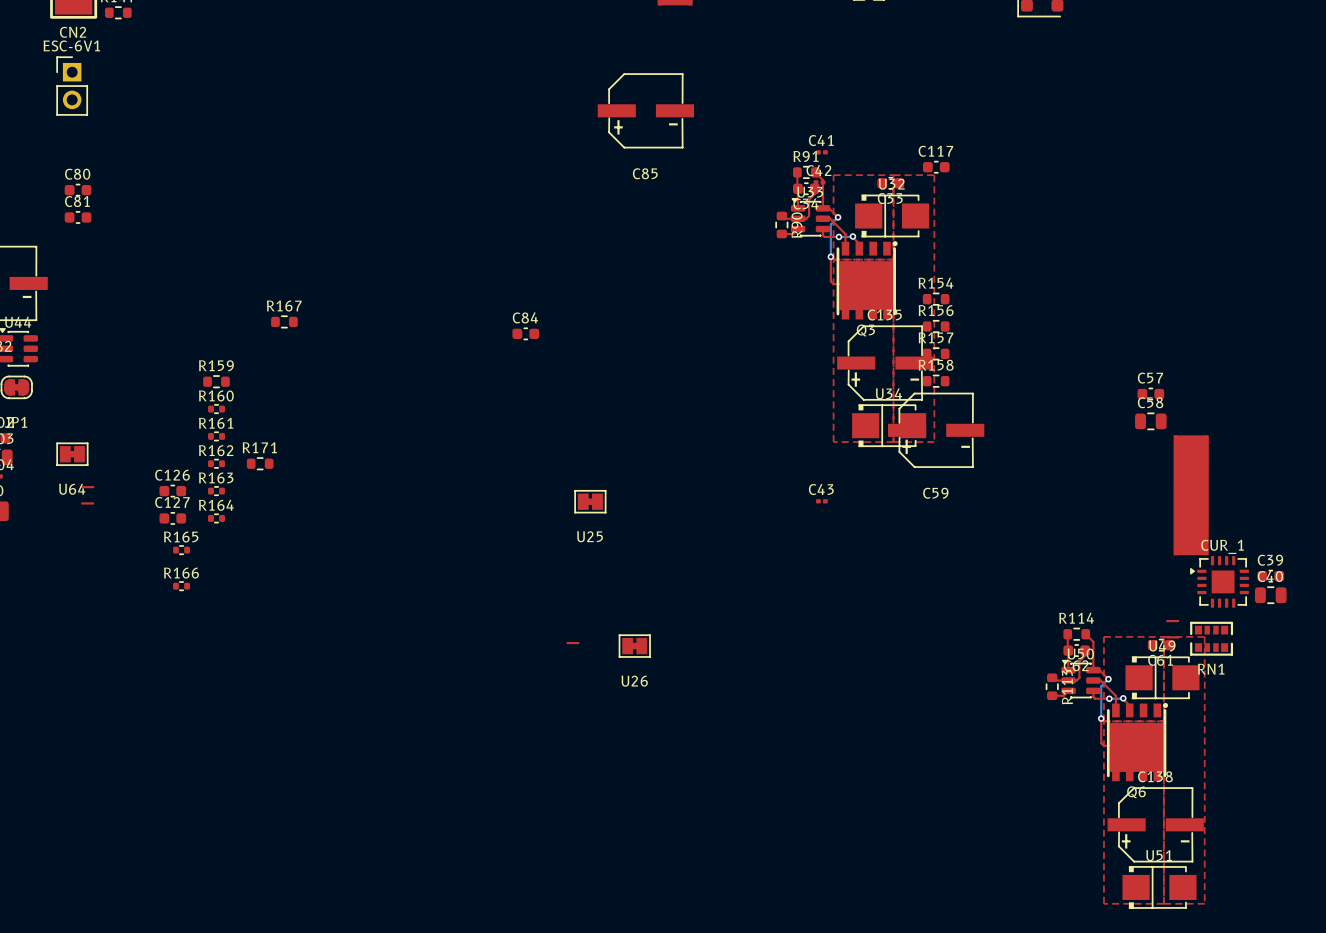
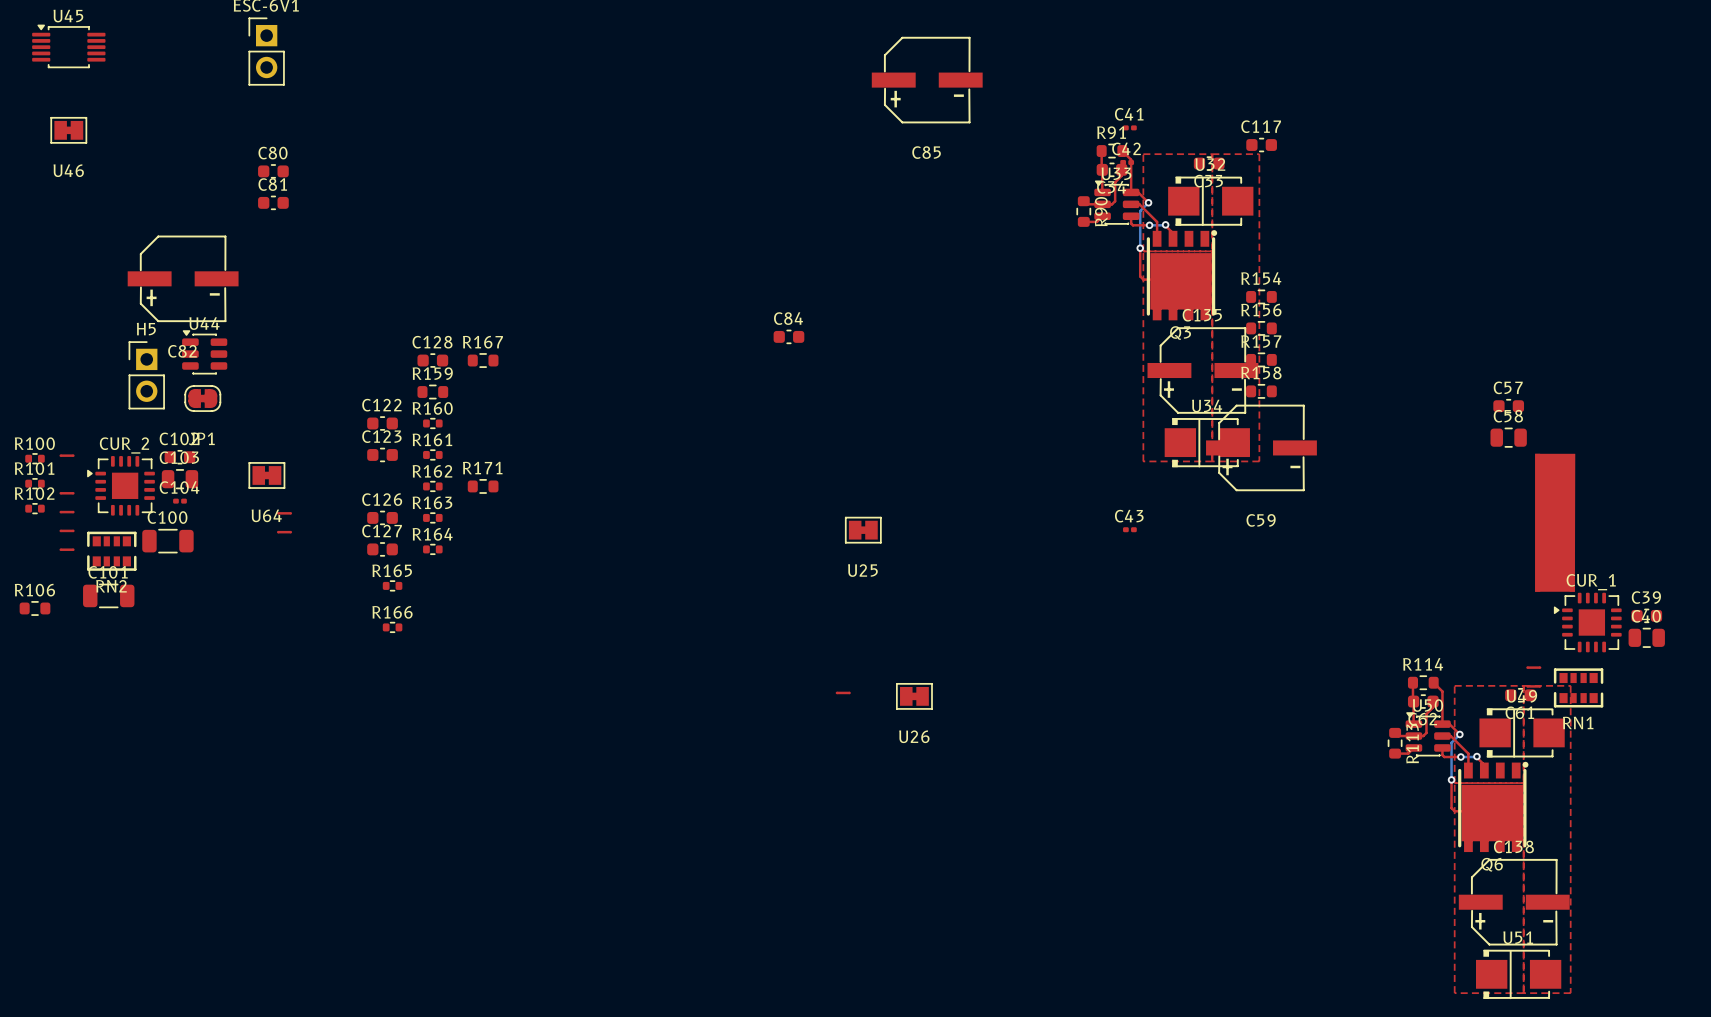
R167 position: (284, 321) -> (483, 360)
C128: none -> (432, 360)
C122: none -> (382, 423)
C123: none -> (382, 454)

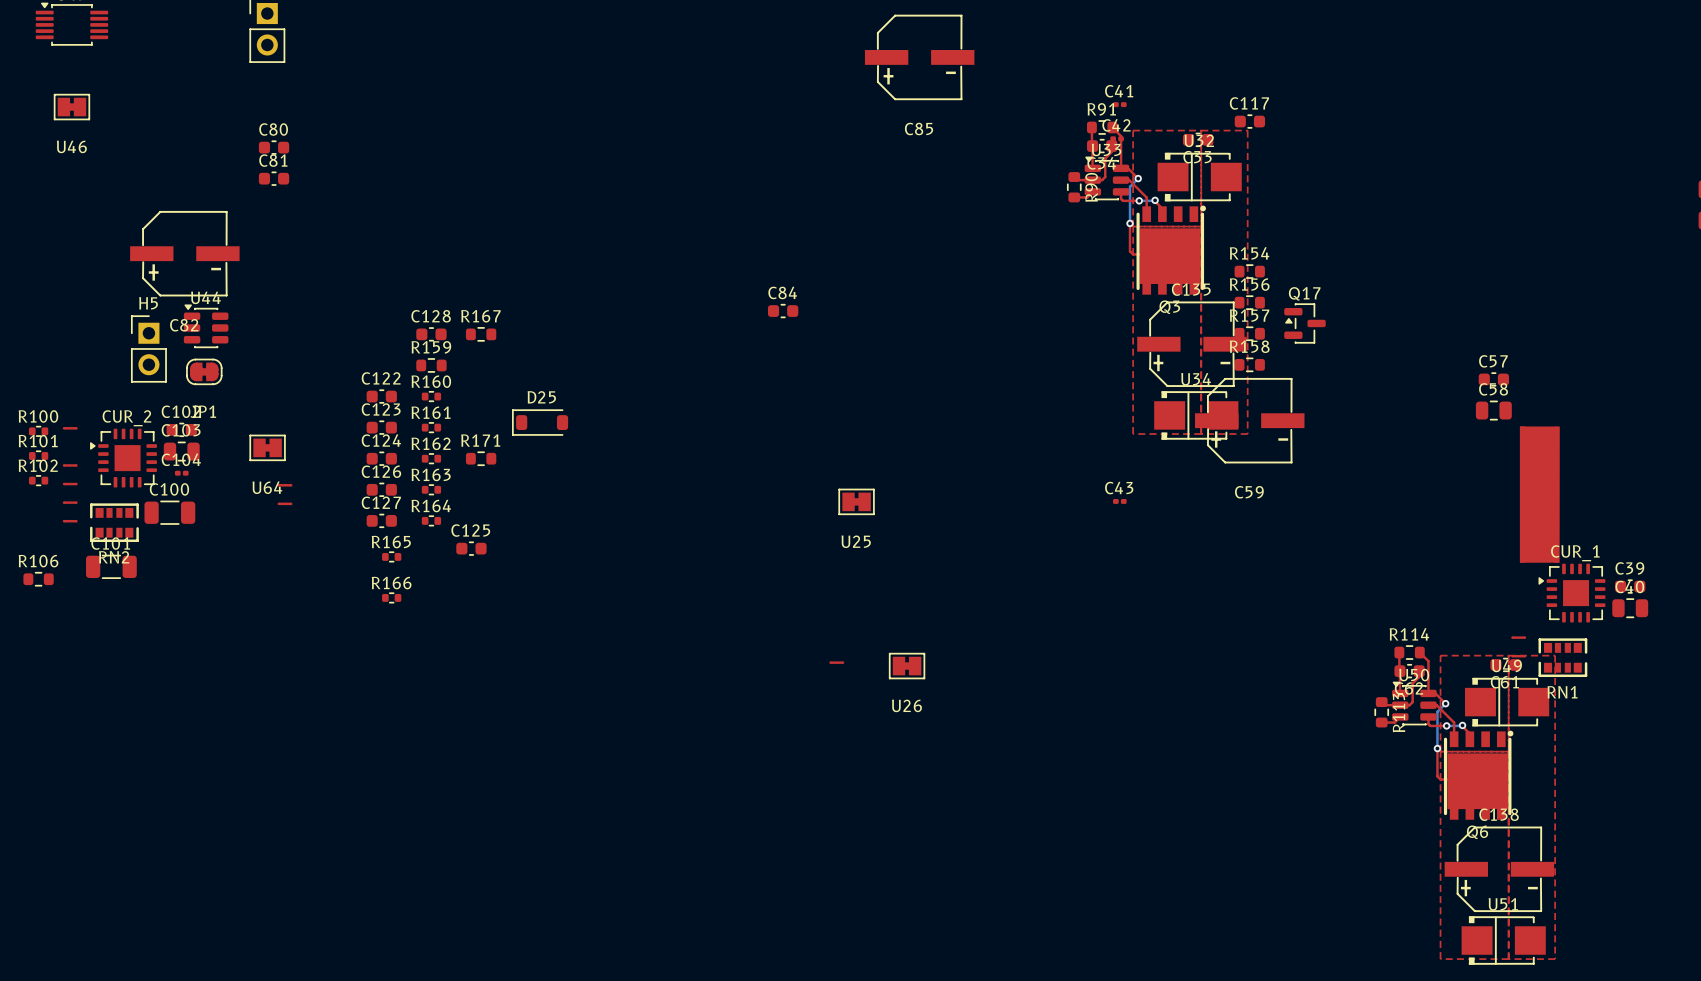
Q17: none -> (1304, 323)
D25: none -> (540, 422)
C124: none -> (381, 458)
C125: none -> (471, 548)

